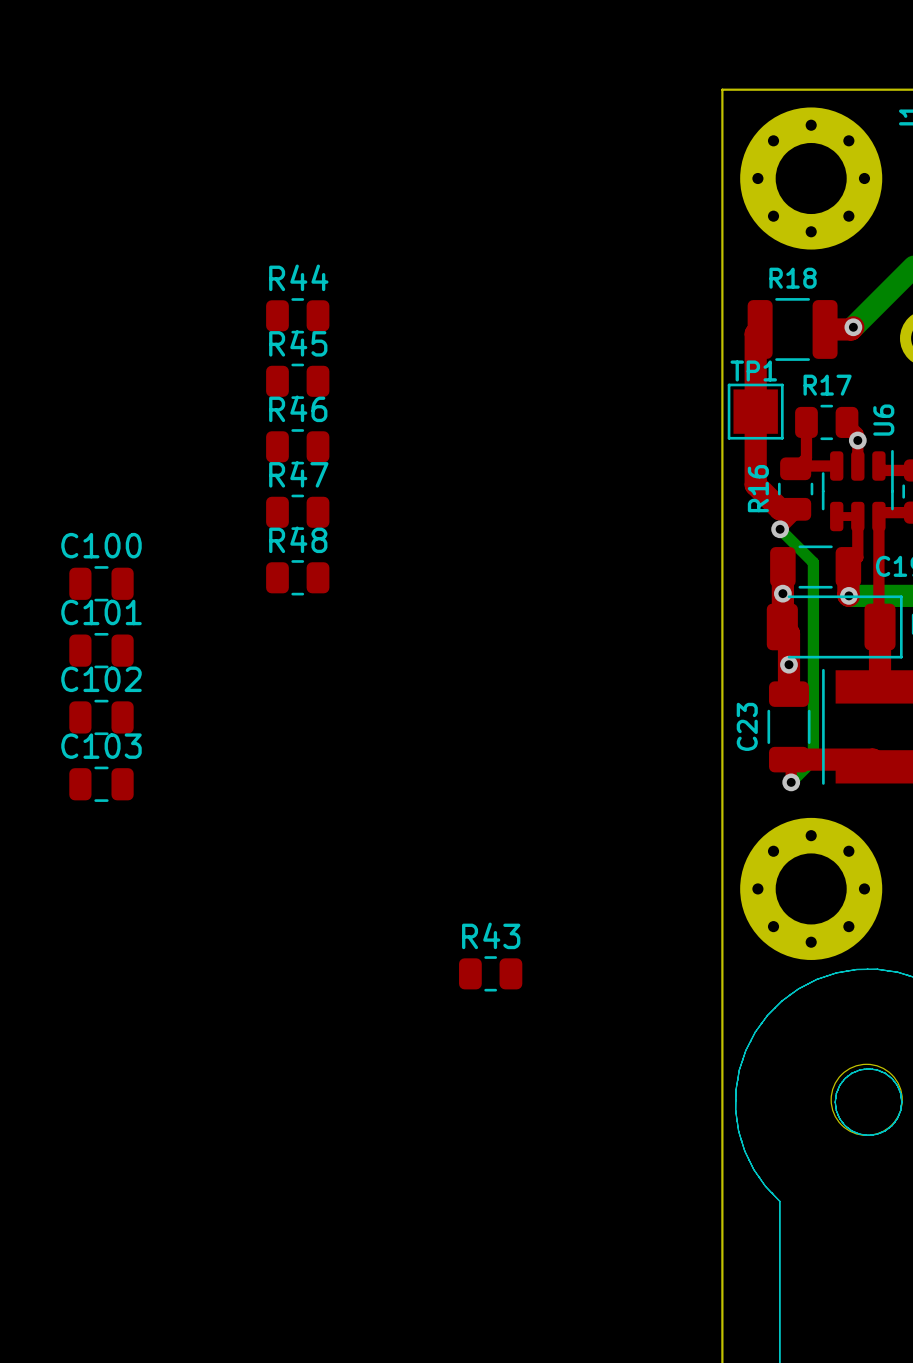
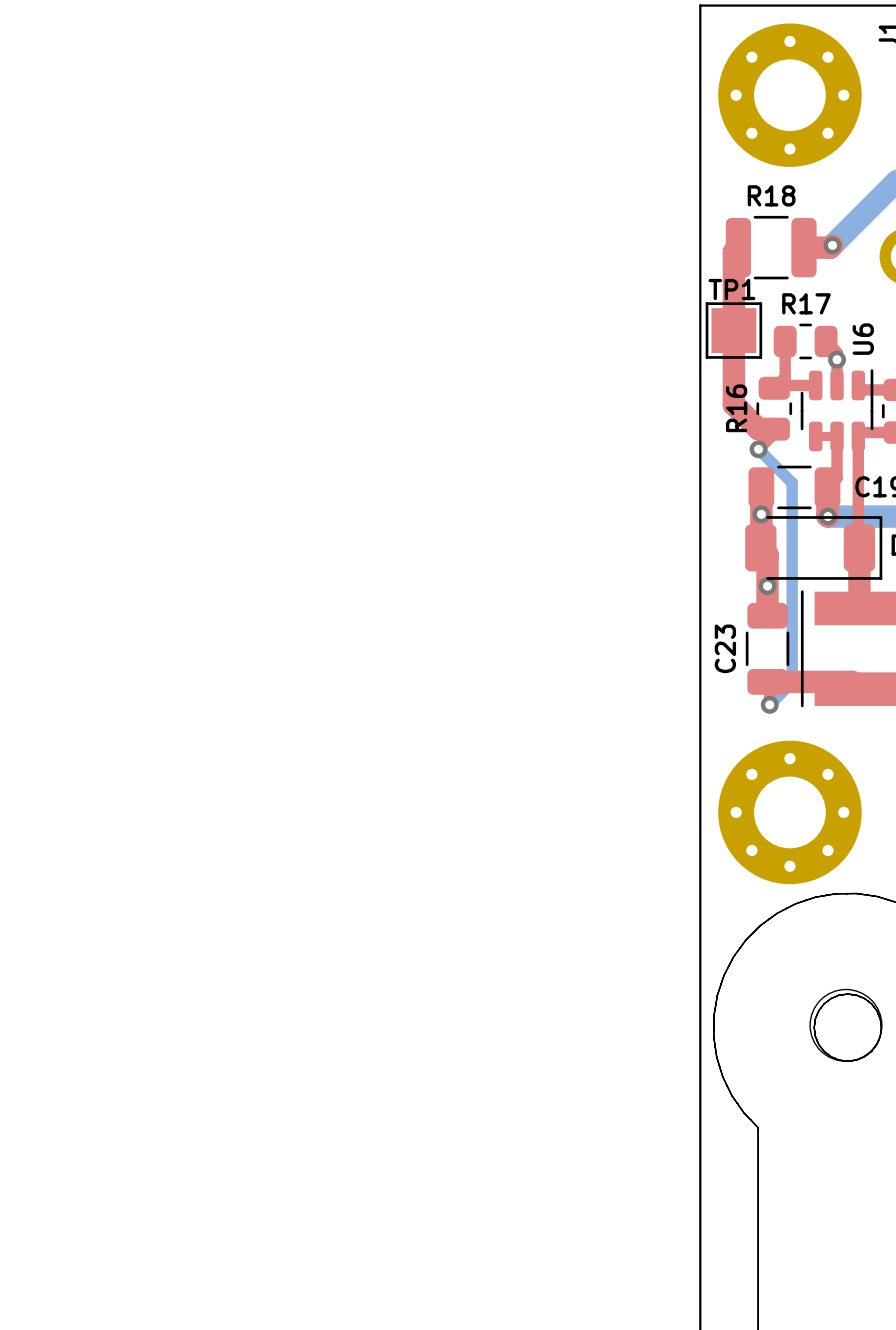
R44: (297, 315) -> none
R45: (297, 381) -> none
R46: (297, 446) -> none
R47: (297, 512) -> none
R48: (297, 577) -> none
C100: (101, 583) -> none
C101: (101, 650) -> none
C102: (101, 717) -> none
C103: (101, 784) -> none
R43: (490, 973) -> none

